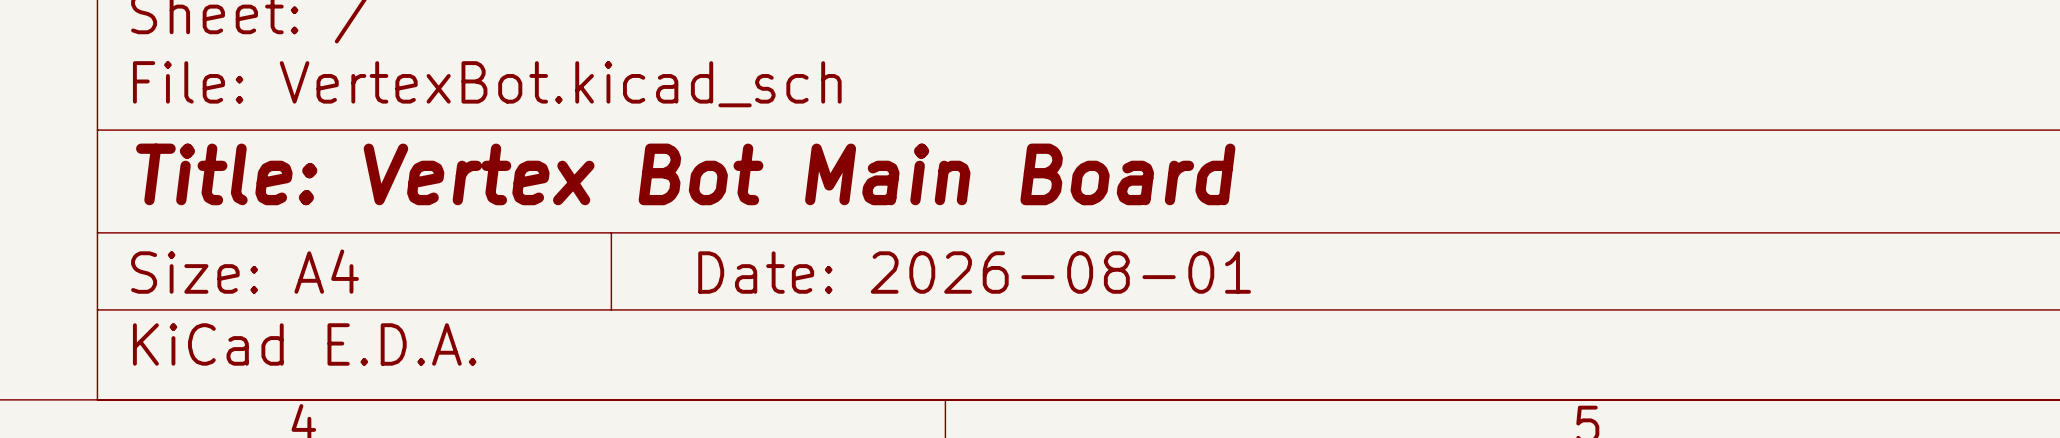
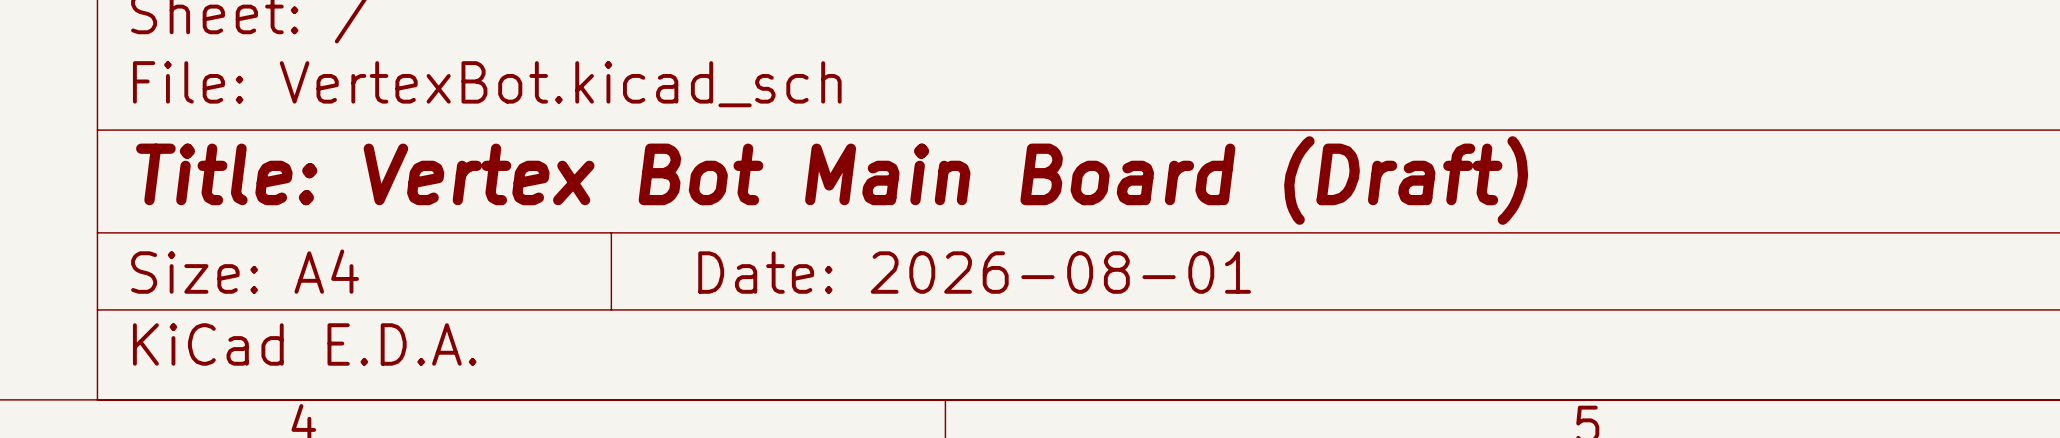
title block: Title: Vertex Bot Main Board (685, 174) -> Title: Vertex Bot Main Board (Draft) (832, 180)

